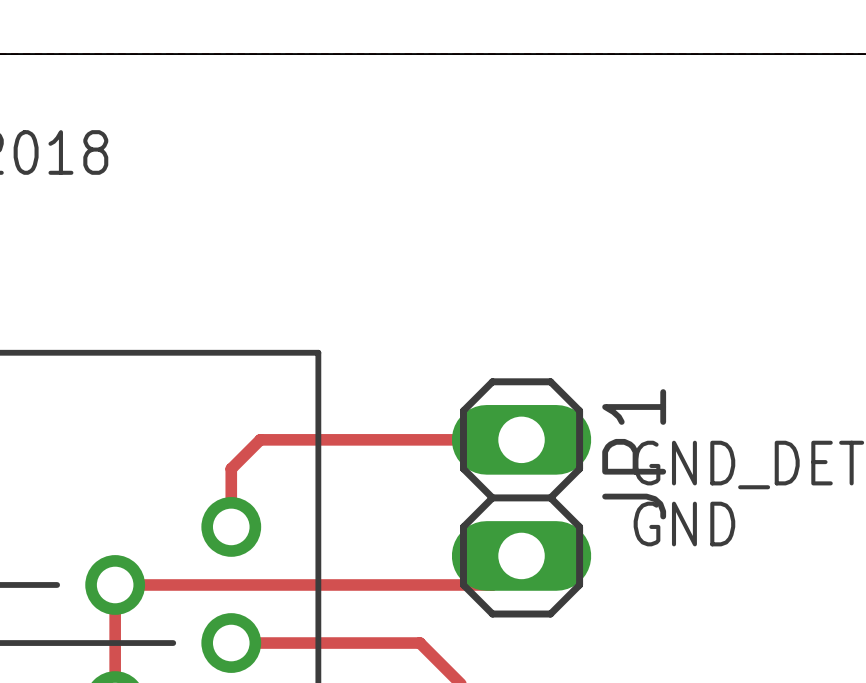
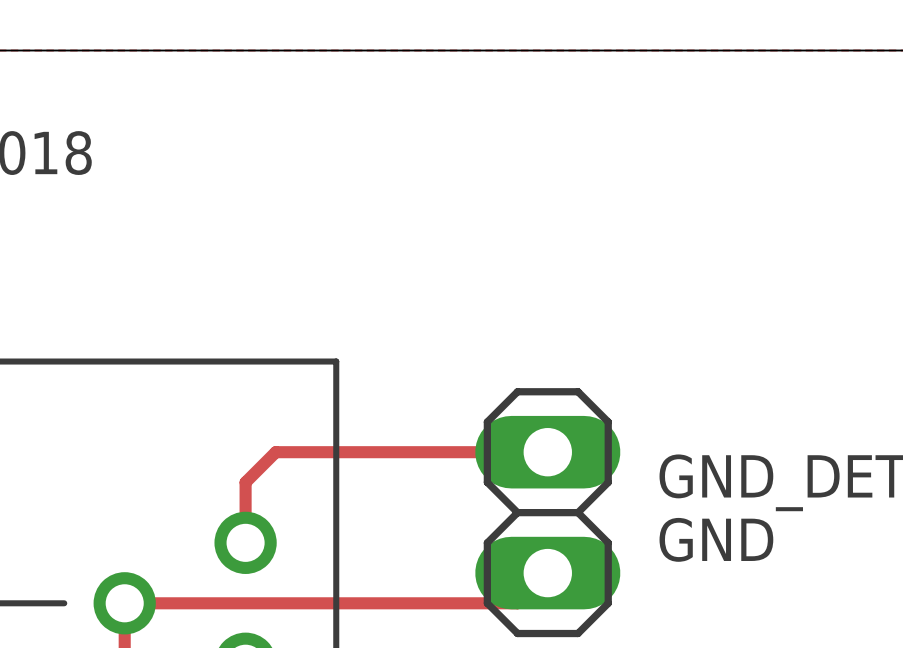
JP1 name: JP1 (634, 454) -> none

